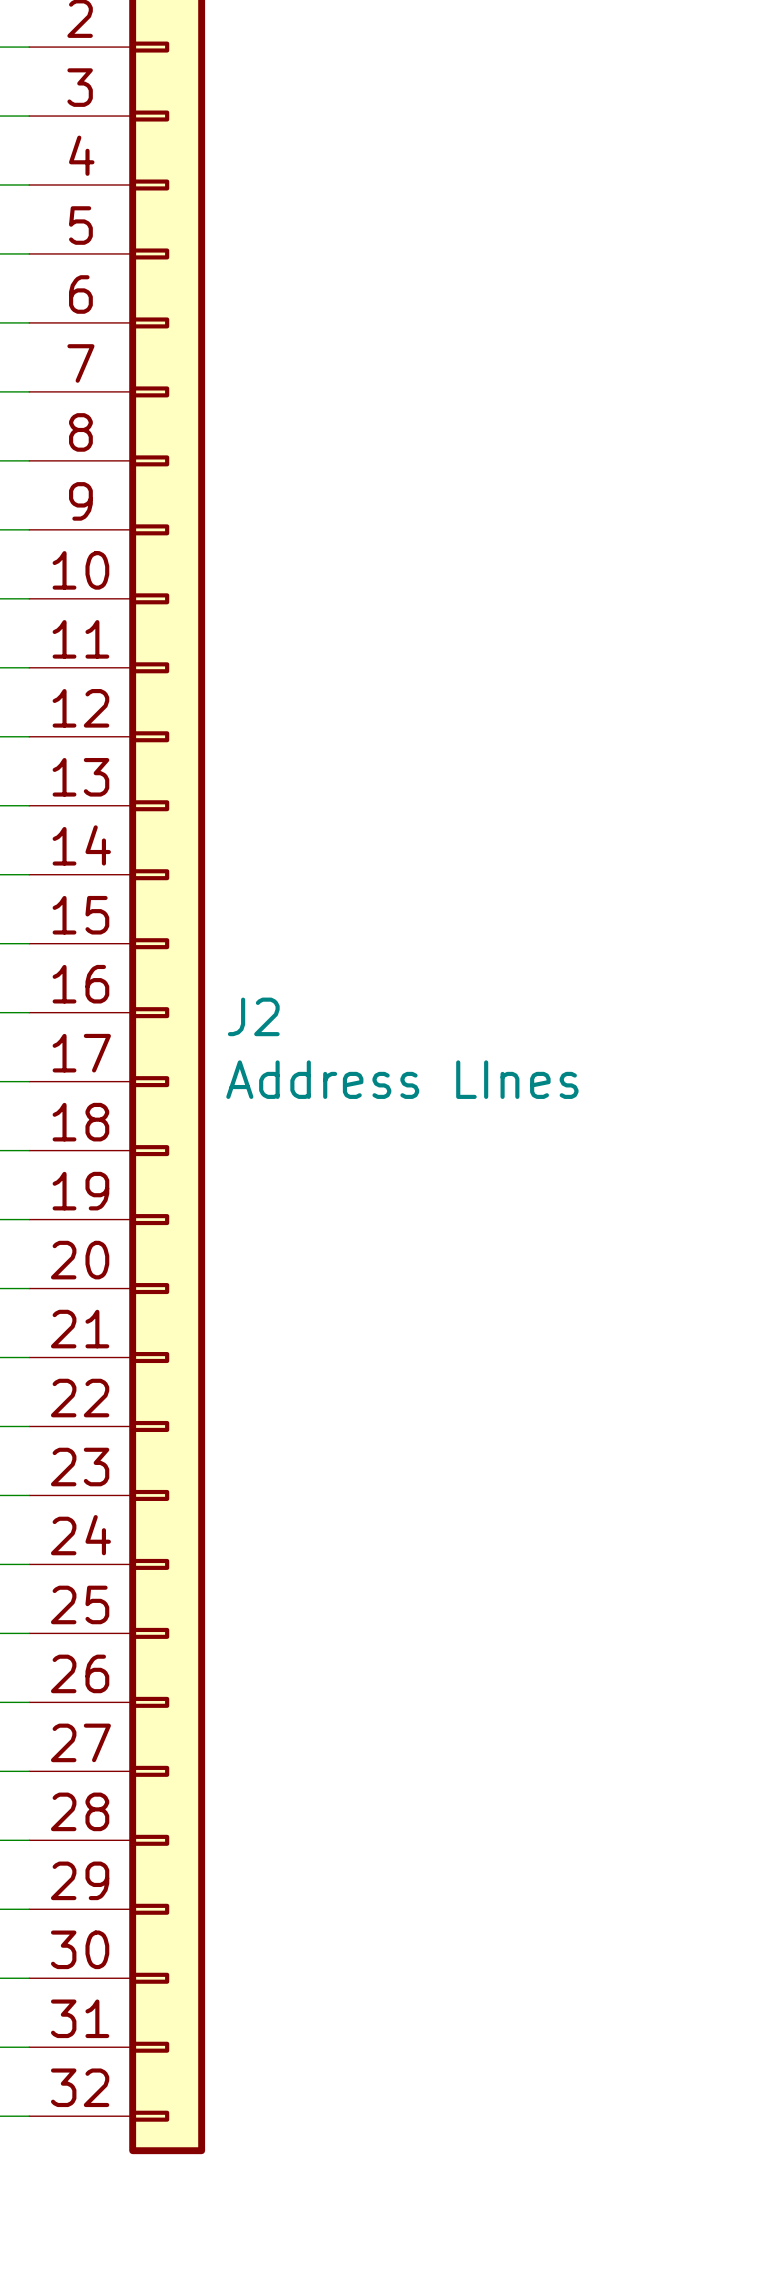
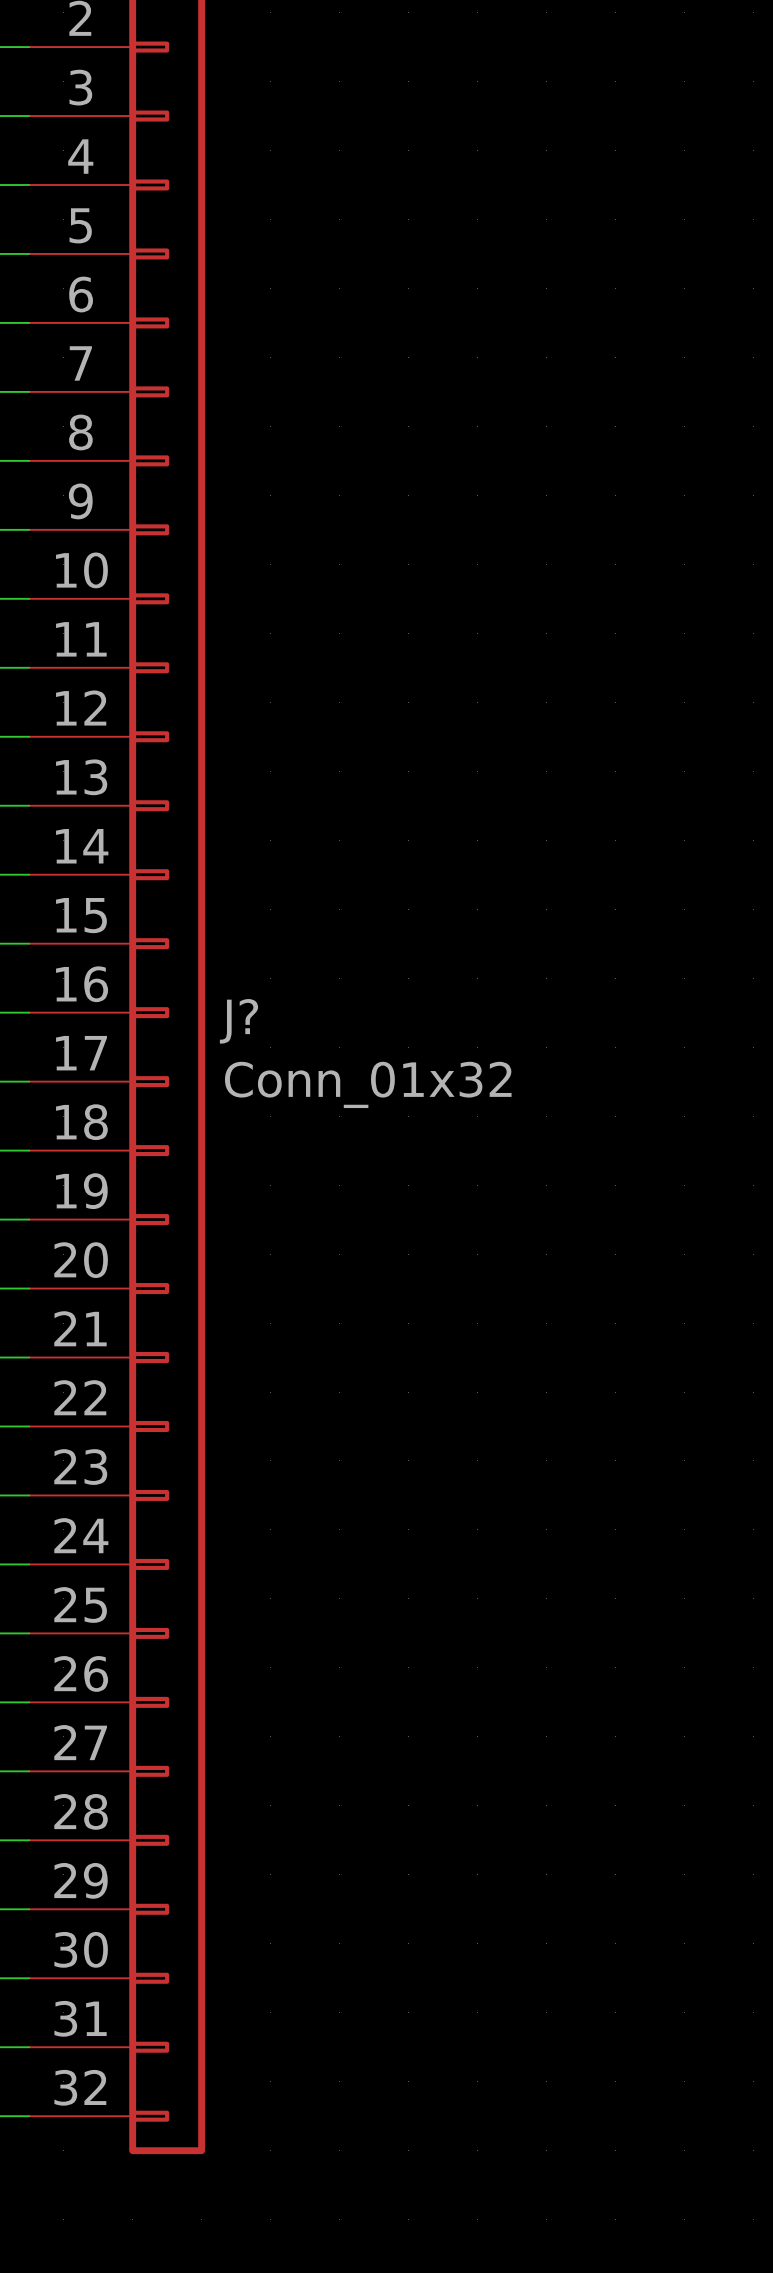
J2 name: J2 (253, 1016) -> J? (238, 1021)
J2 value: Address LInes (402, 1079) -> Conn_01x32 (368, 1084)

